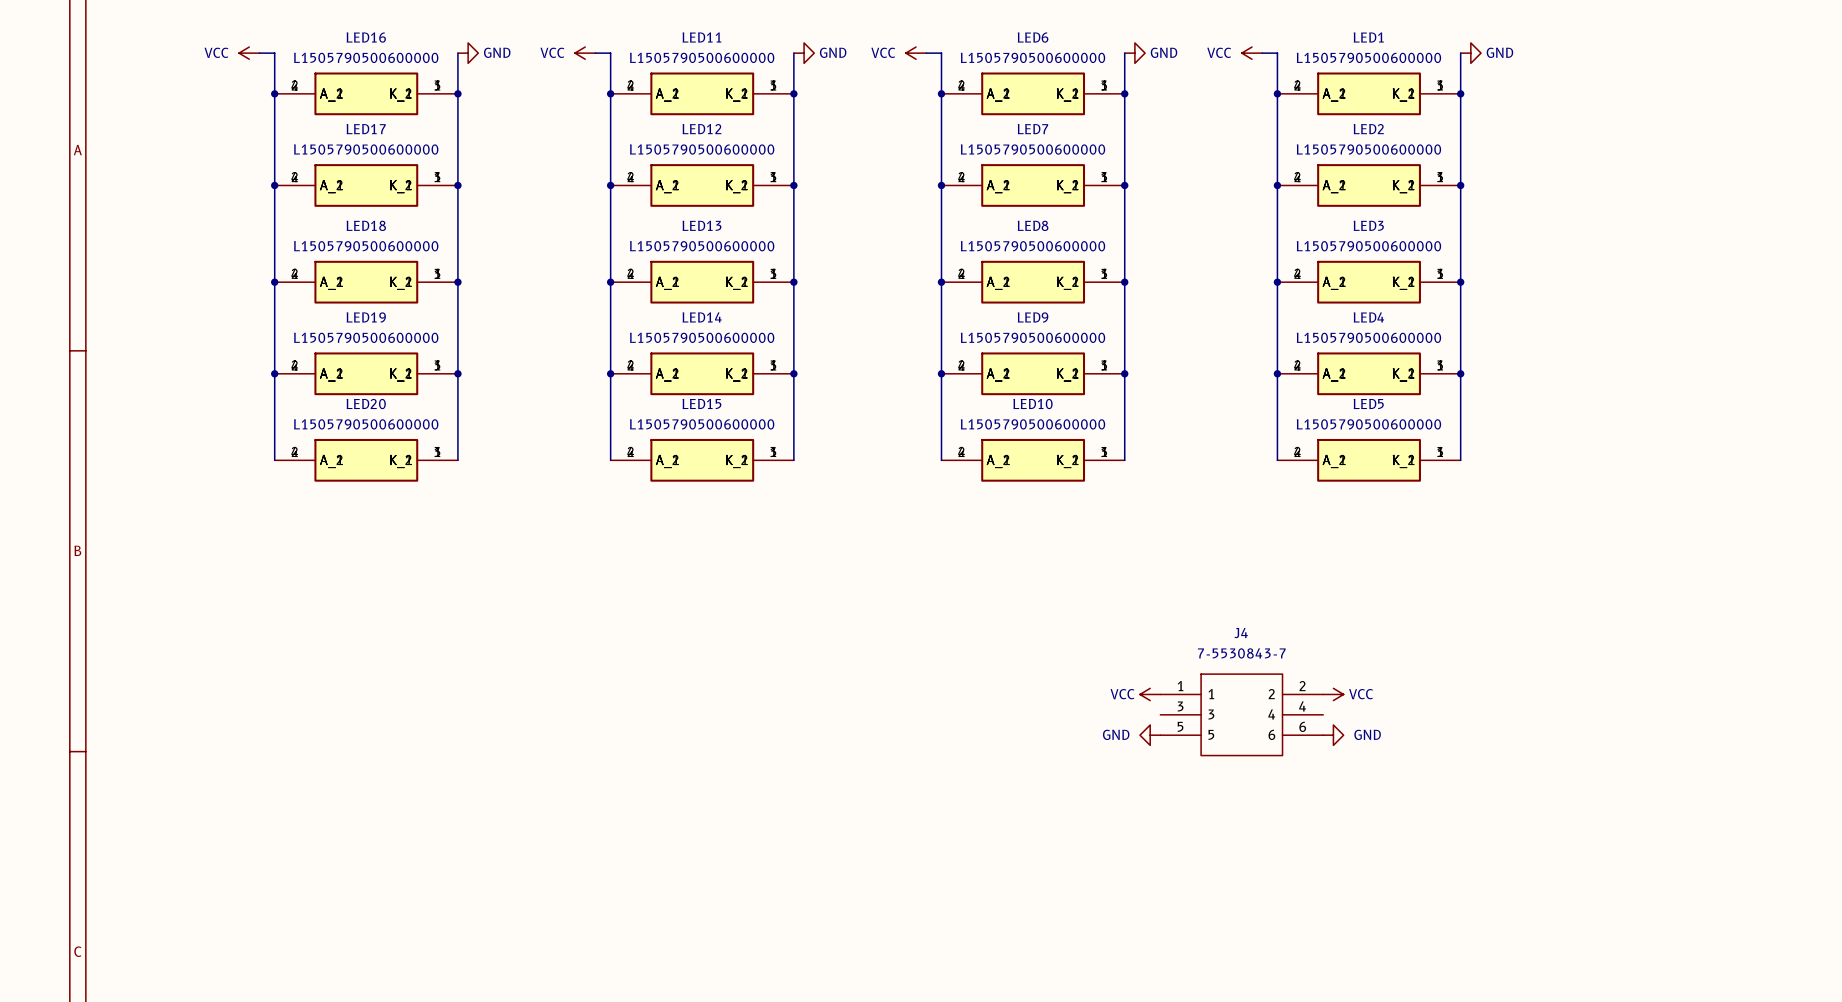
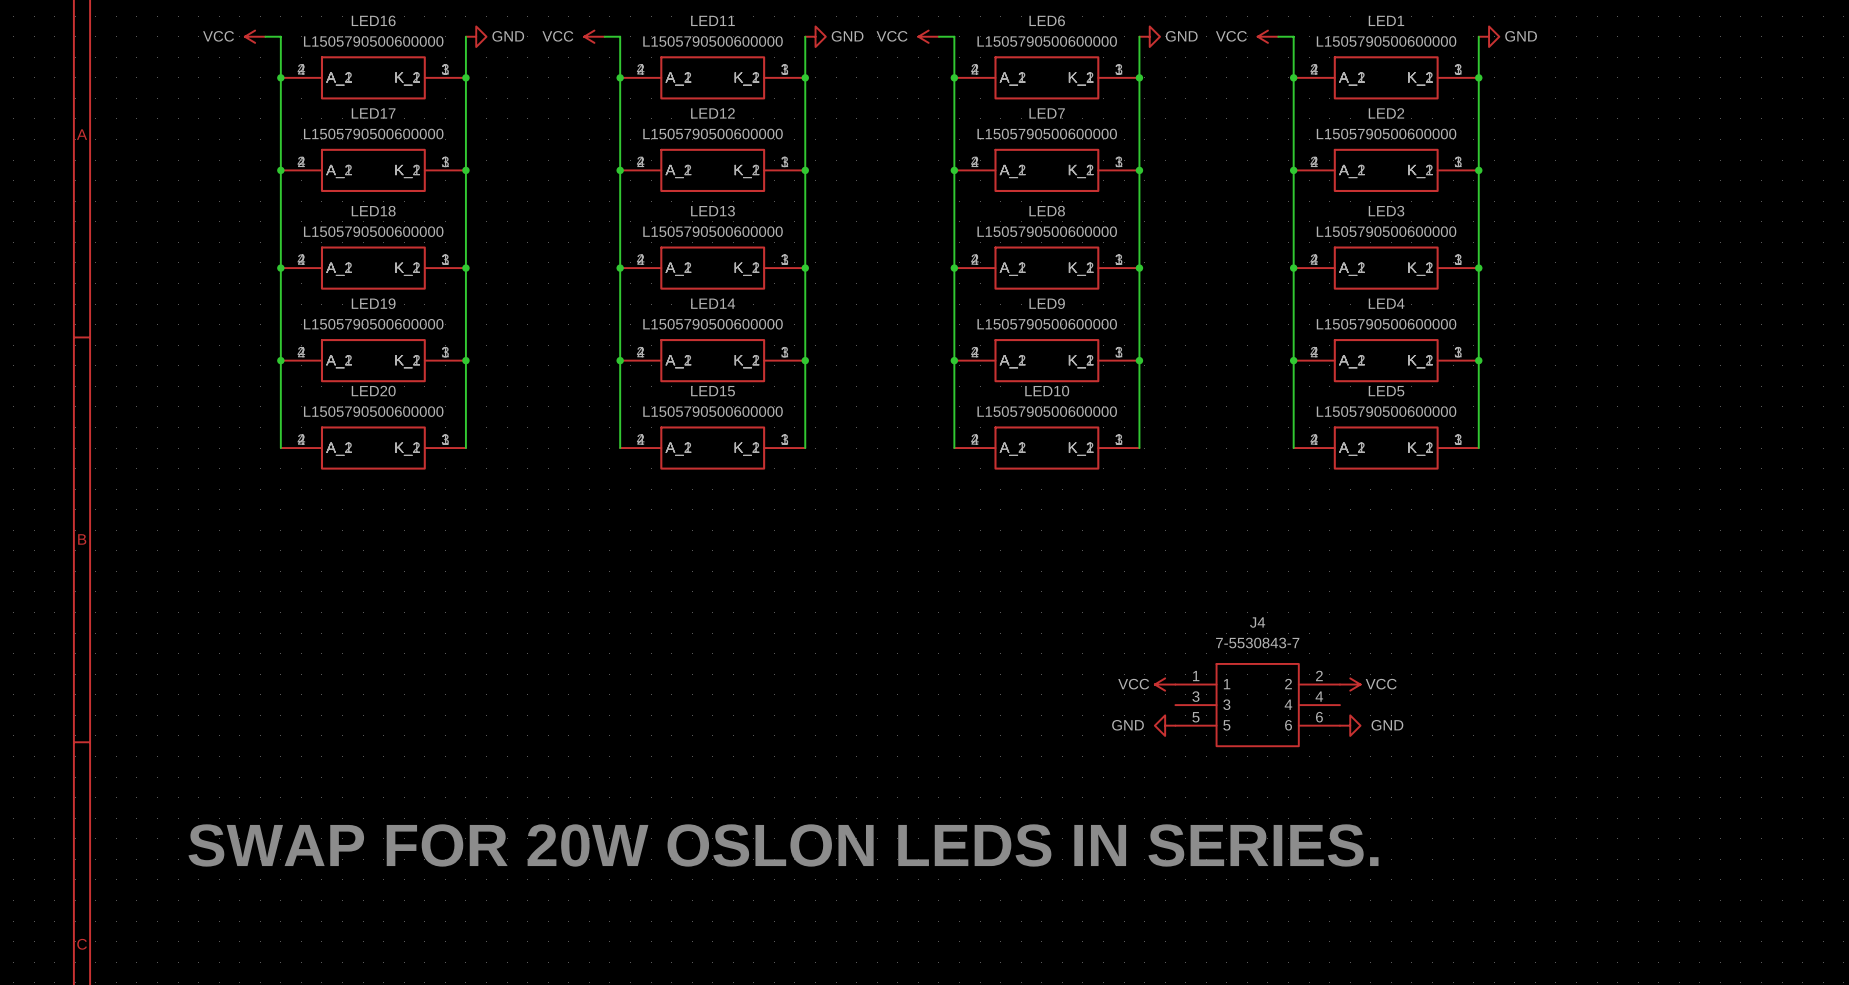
text: none -> SWAP FOR 20W OSLON LEDS IN SERIES. (783, 845)

